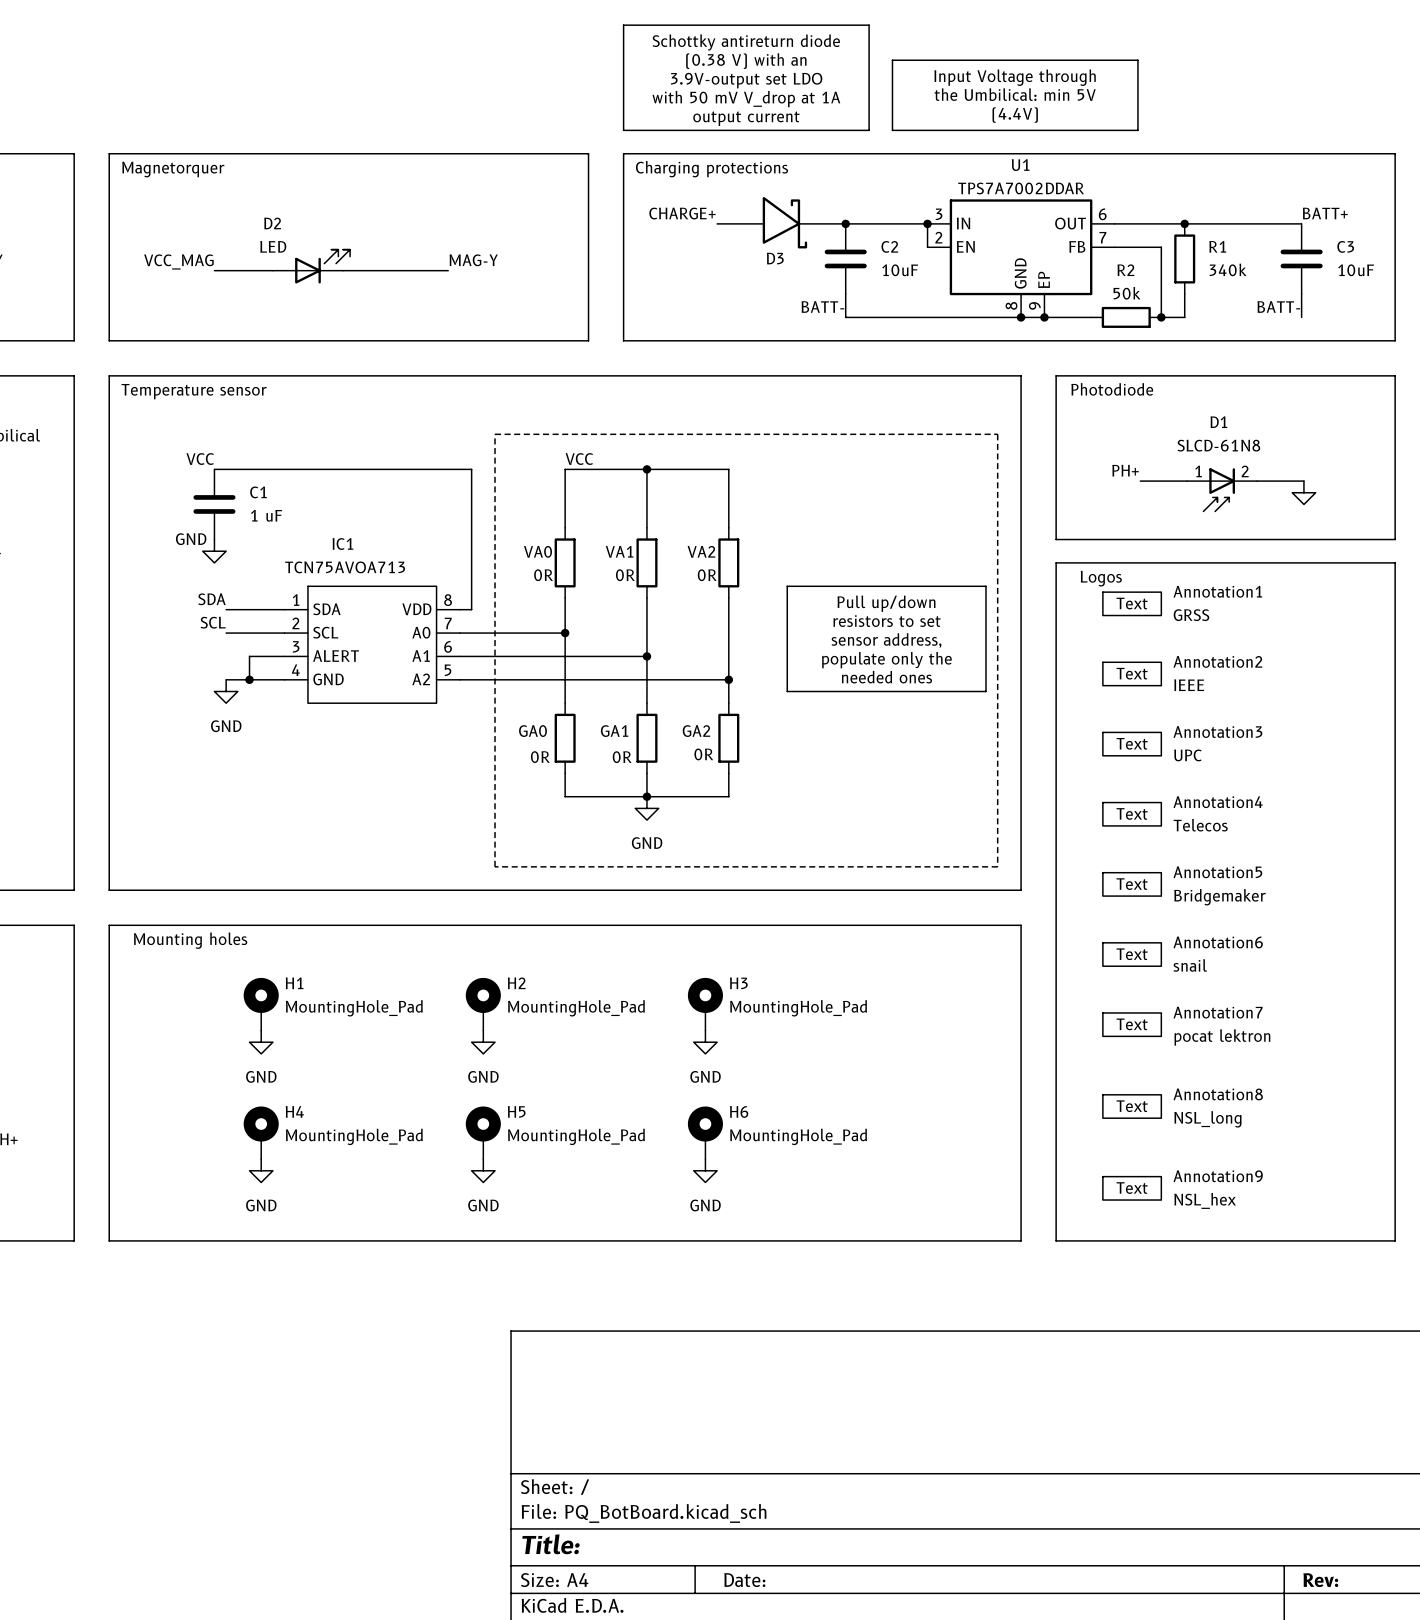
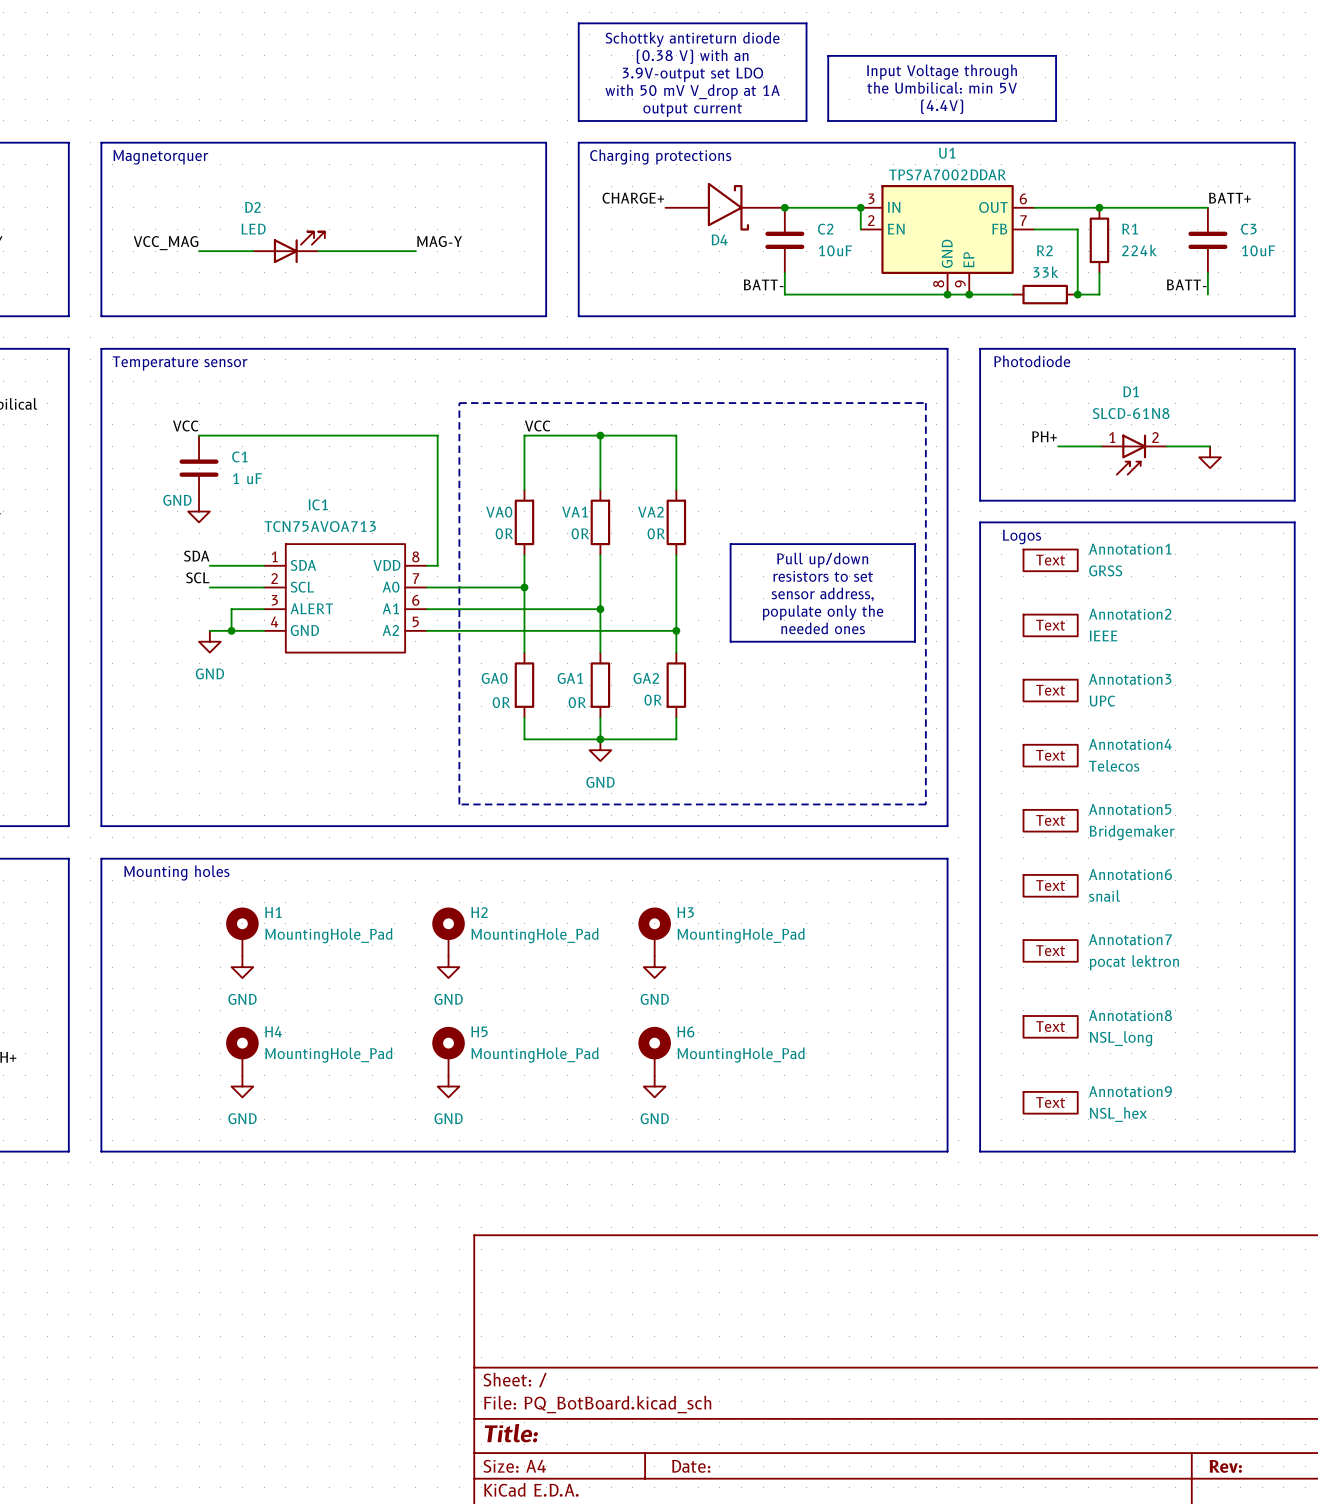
D3 name: D3 (775, 258) -> D4 (719, 239)
R1 value: 340k (1228, 269) -> 224k (1139, 250)
R2 value: 50k (1127, 293) -> 33k (1045, 272)

